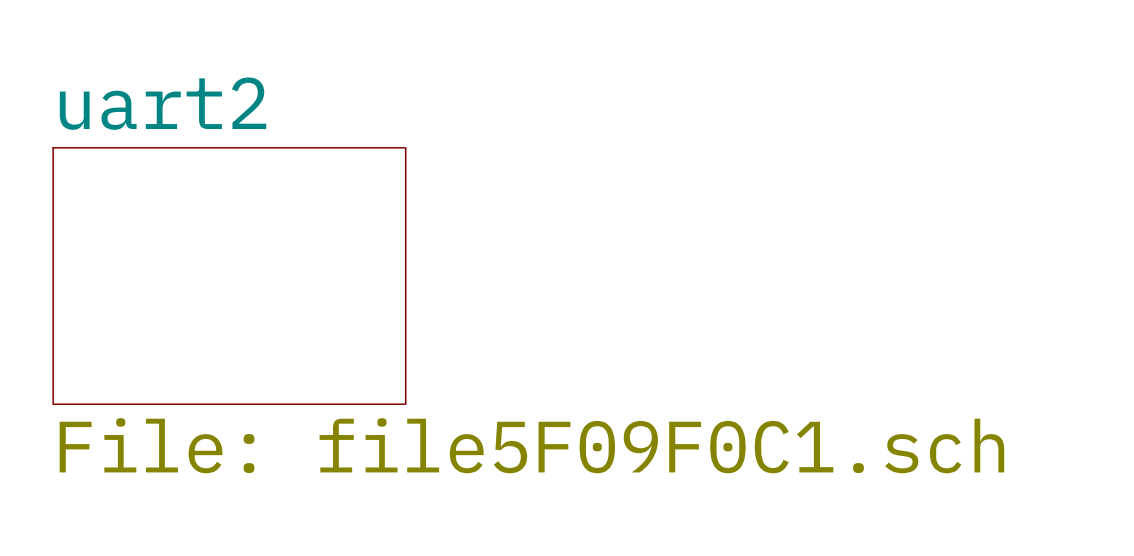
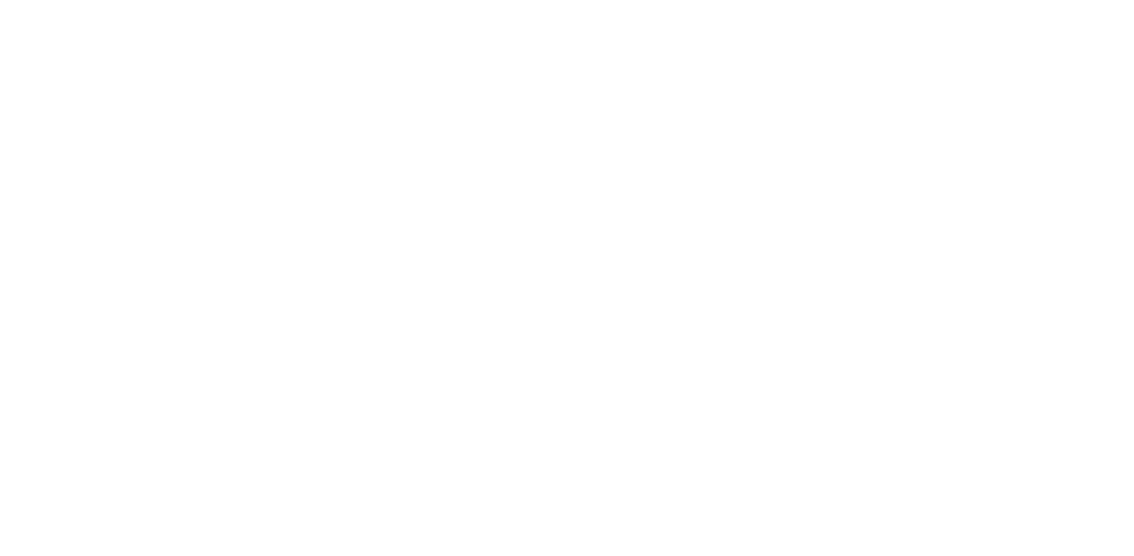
sheet uart2: File: file5F09F0C1.sch (229, 276) -> none

